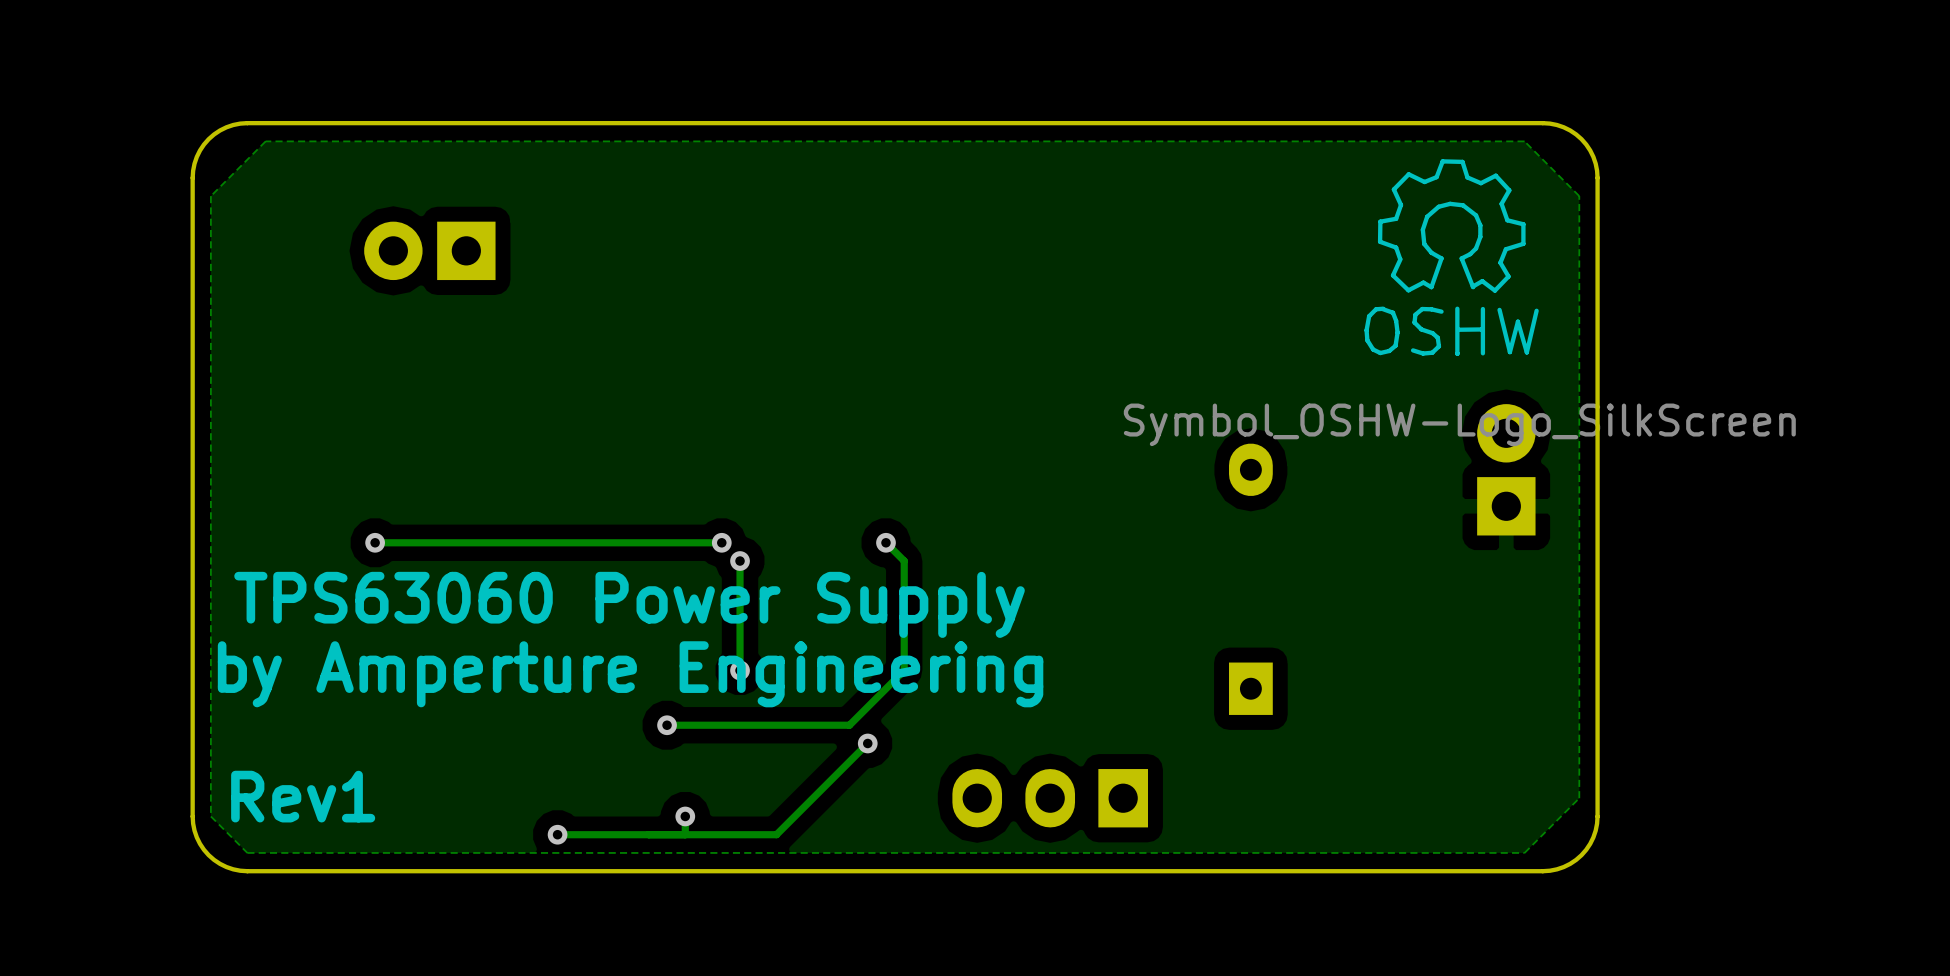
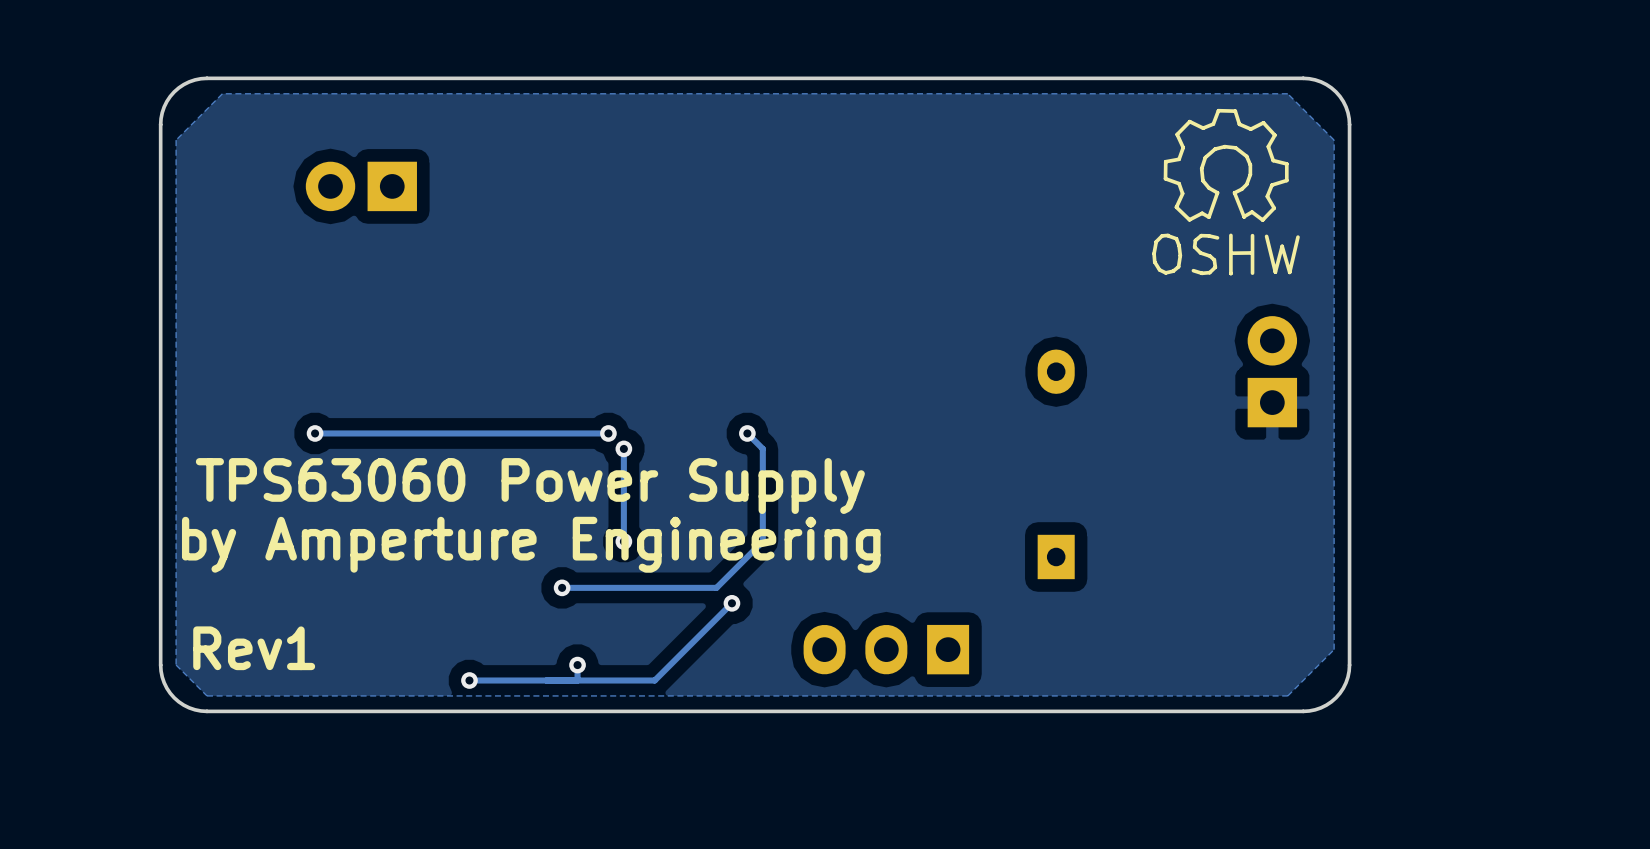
drawing shape: [1123, 159, 1796, 447] -> [1152, 108, 1300, 276]

